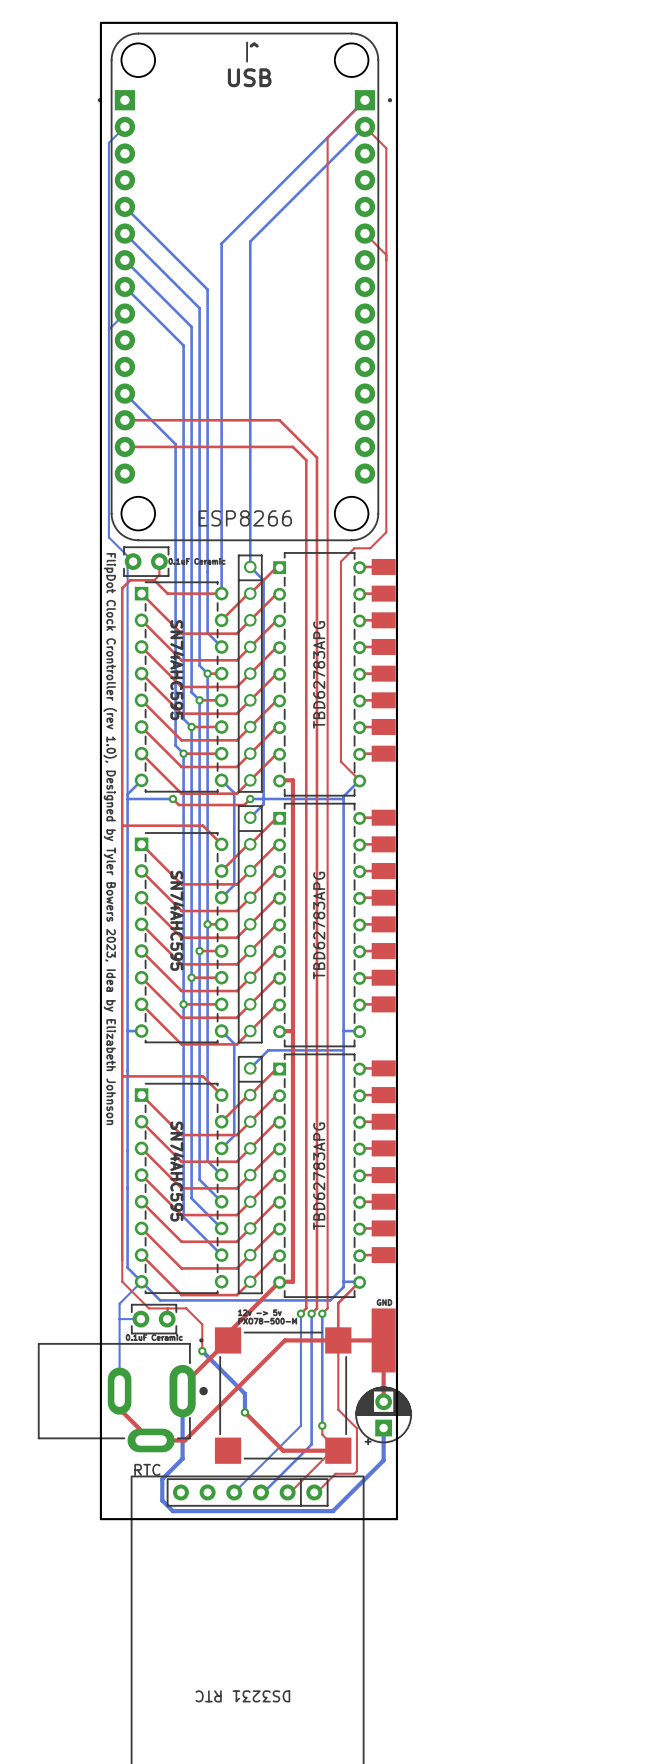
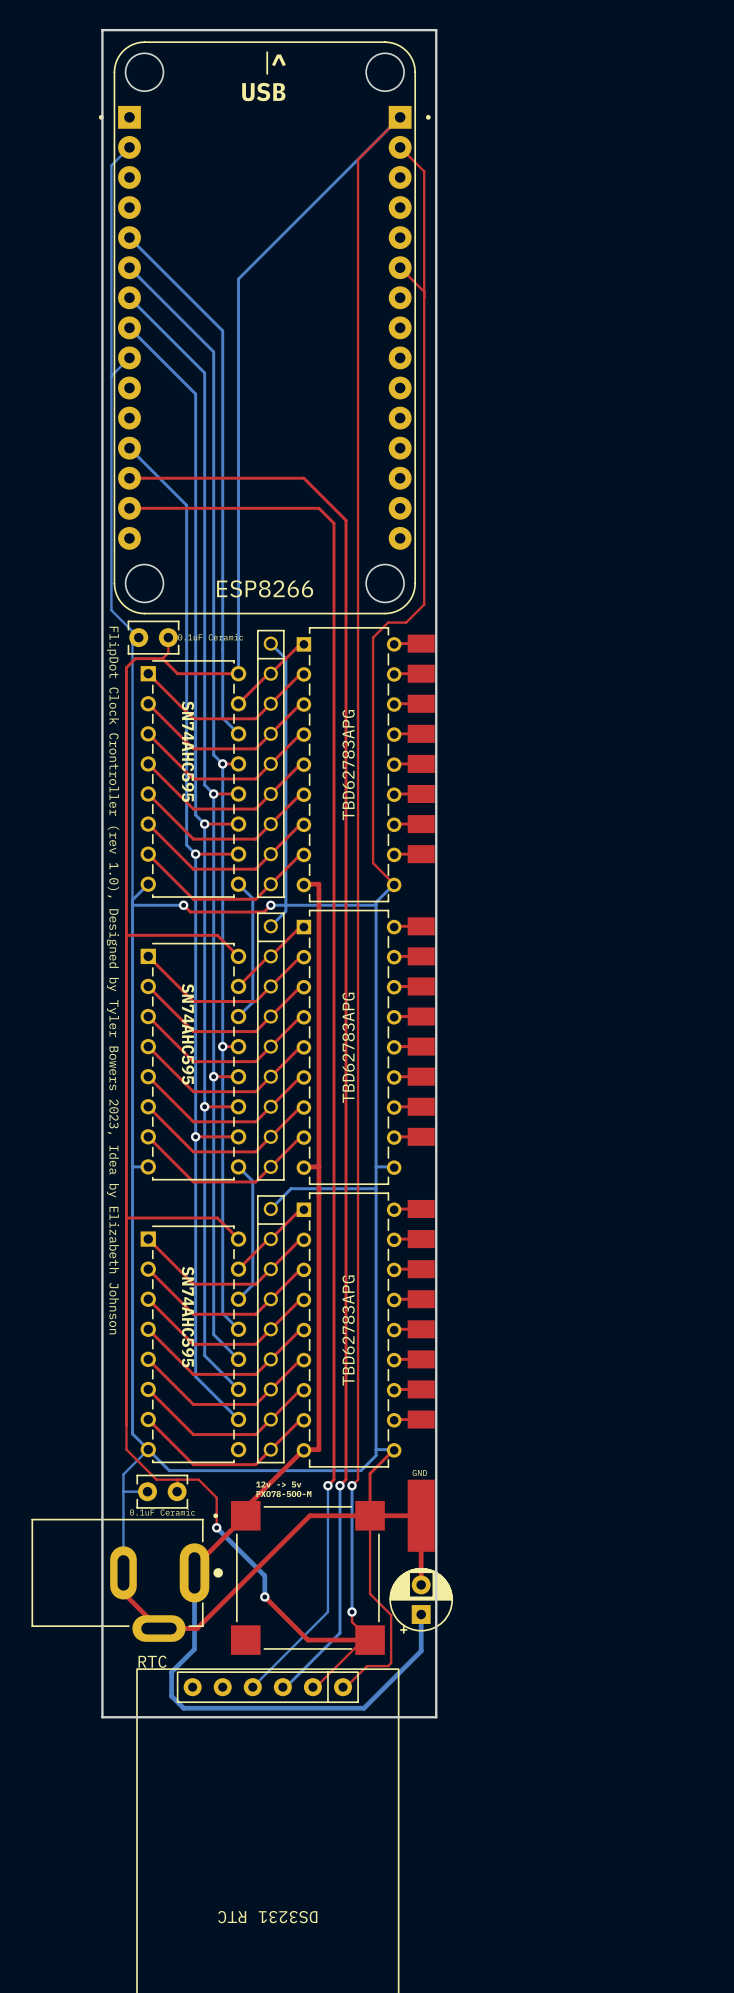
bottom track: (364, 126) (250, 241) (250, 566) -> none

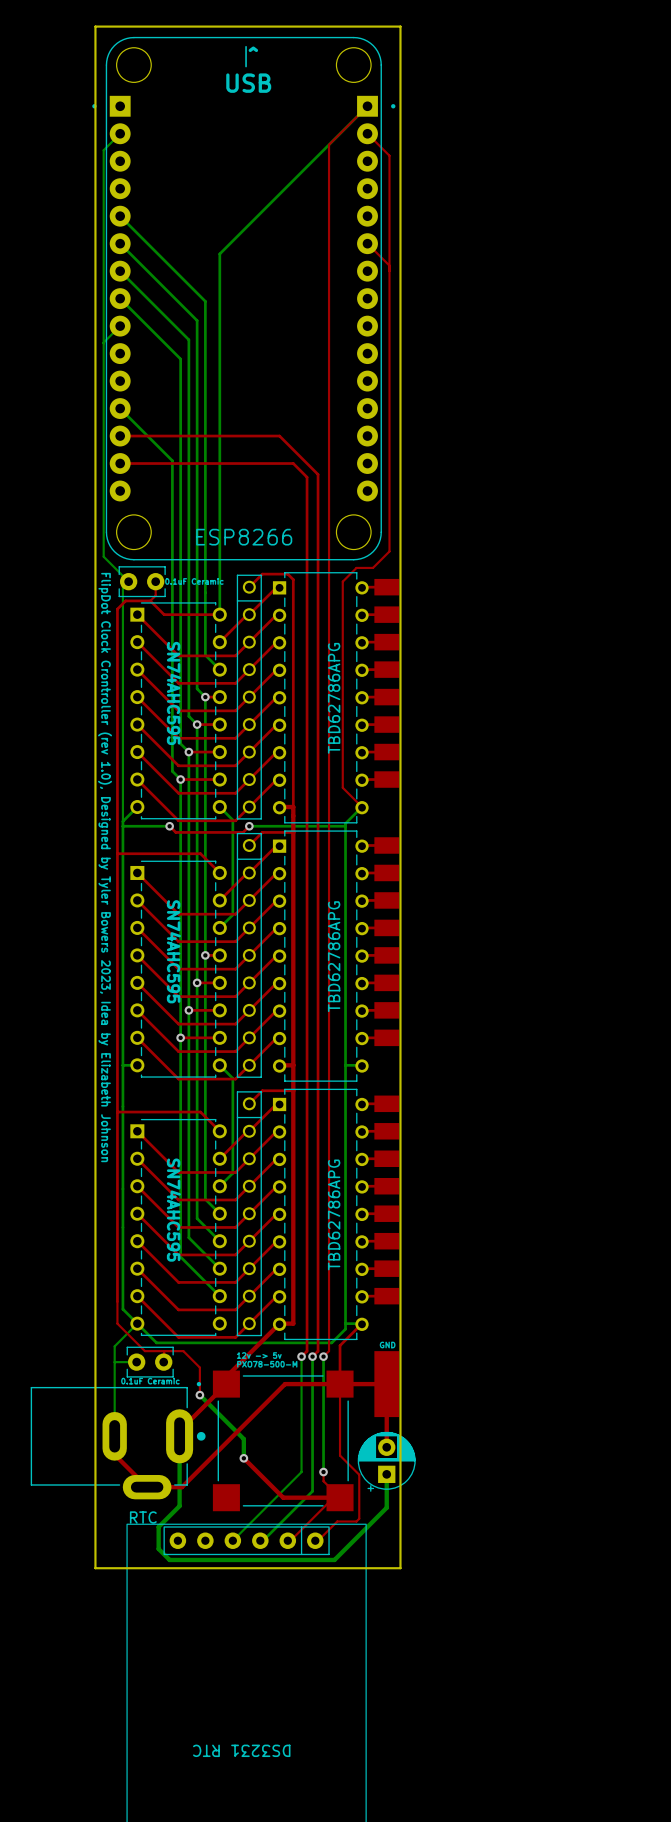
top track: none -> (249, 587) (262, 574) (287, 574) (293, 579) (293, 815)
bottom track: (270, 643) (285, 658) (285, 911) (270, 926) -> none
part value: TBD62783APG (348, 765) -> TBD62786APG (334, 698)
top track: none -> (293, 832) (262, 832) (249, 845)
part value: TBD62783APG (348, 1047) -> TBD62786APG (334, 956)
bottom track: (376, 1188) (291, 1188) (270, 1209) -> none
top track: none -> (293, 1090) (262, 1090) (249, 1103)
part value: TBD62783APG (348, 1330) -> TBD62786APG (334, 1214)

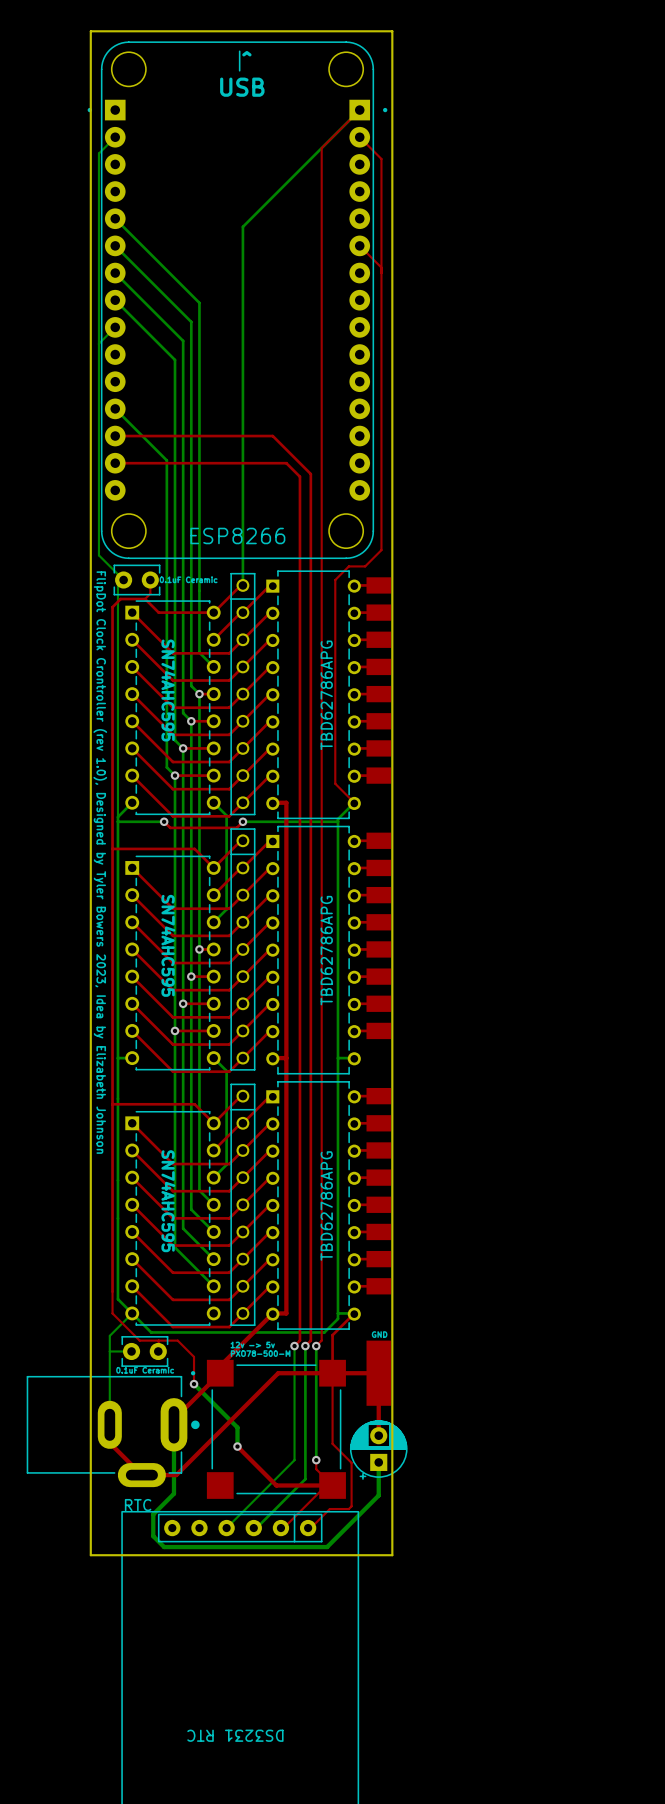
bottom track: (249, 224) (219, 253) (219, 614) -> (242, 226) (242, 585)
top track: none -> (240, 585) (213, 612)
top track: (249, 587) (262, 574) (287, 574) (293, 579) (293, 815) -> none
top track: (293, 832) (262, 832) (249, 845) -> none
top track: none -> (240, 840) (213, 867)
top track: (293, 1090) (262, 1090) (249, 1103) -> none
top track: none -> (240, 1096) (213, 1123)

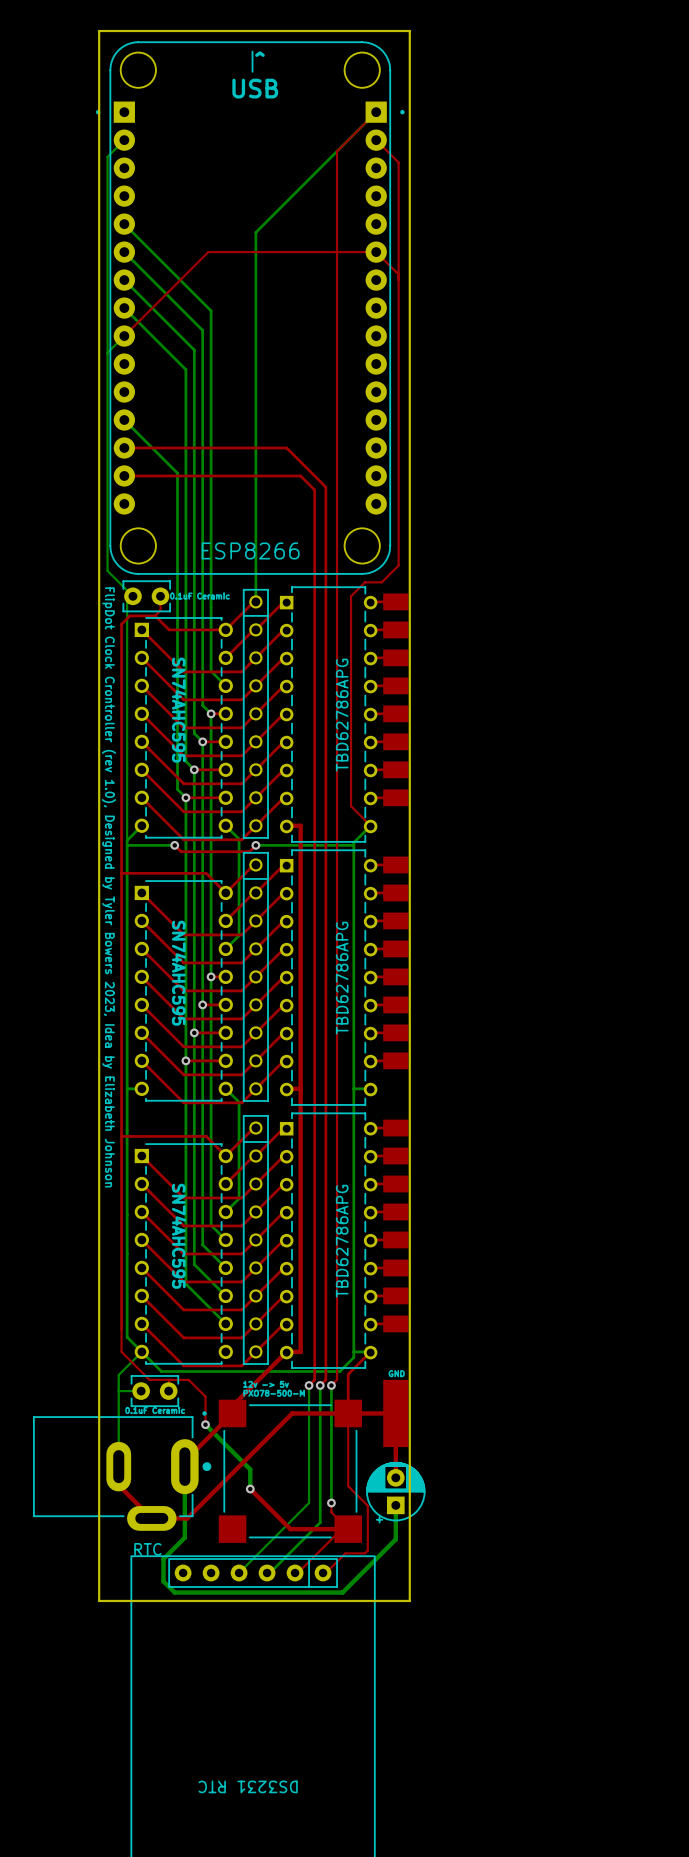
top track: none -> (376, 252) (208, 252) (124, 336)

